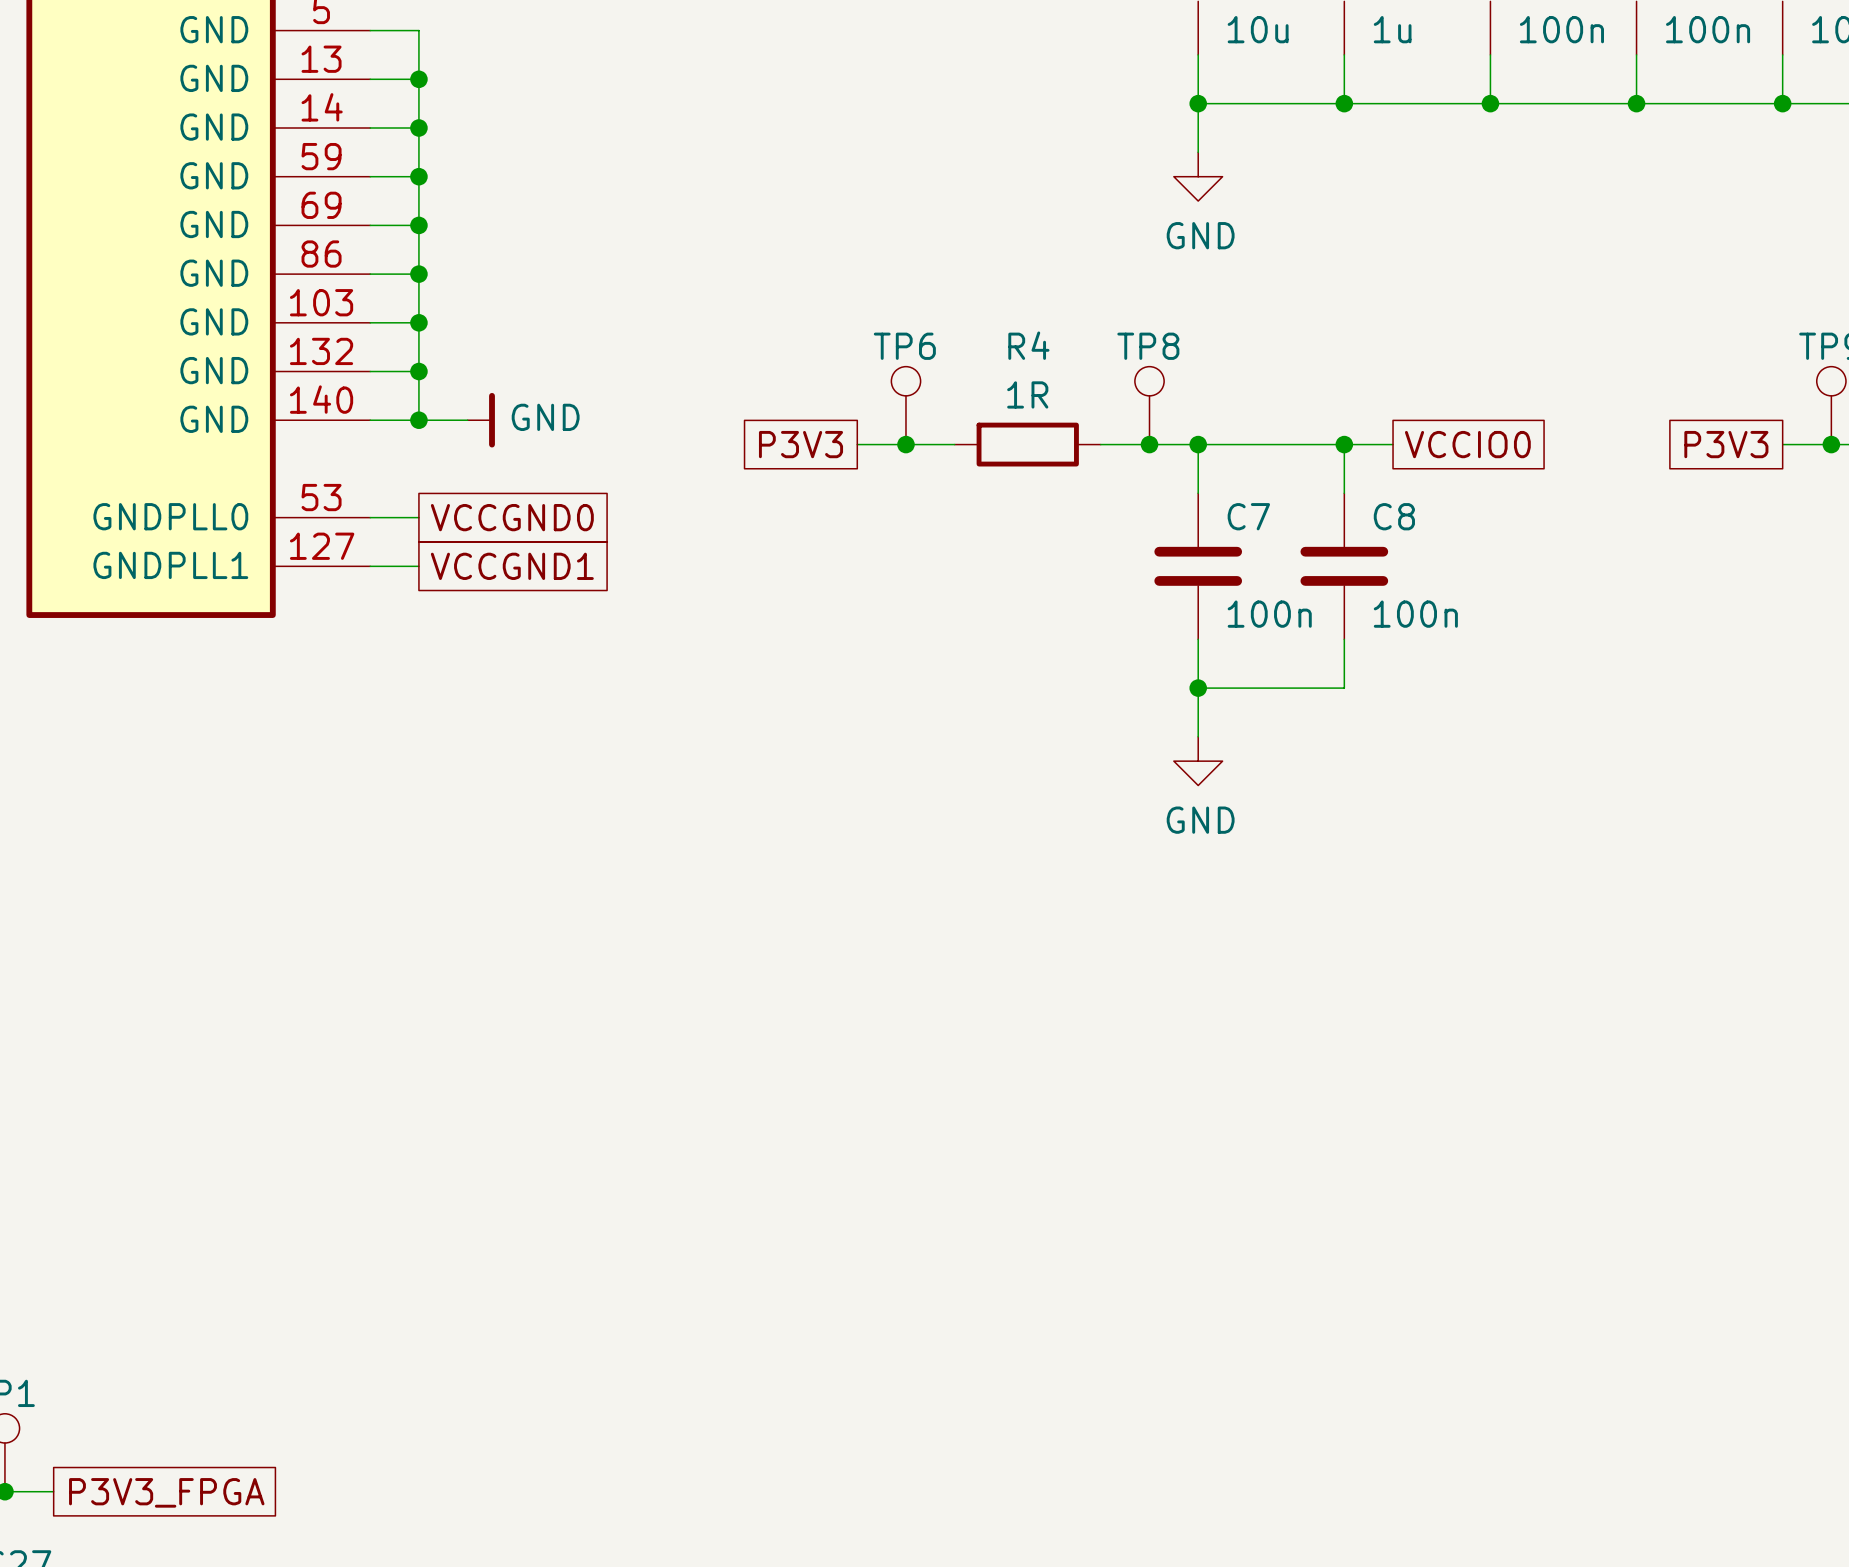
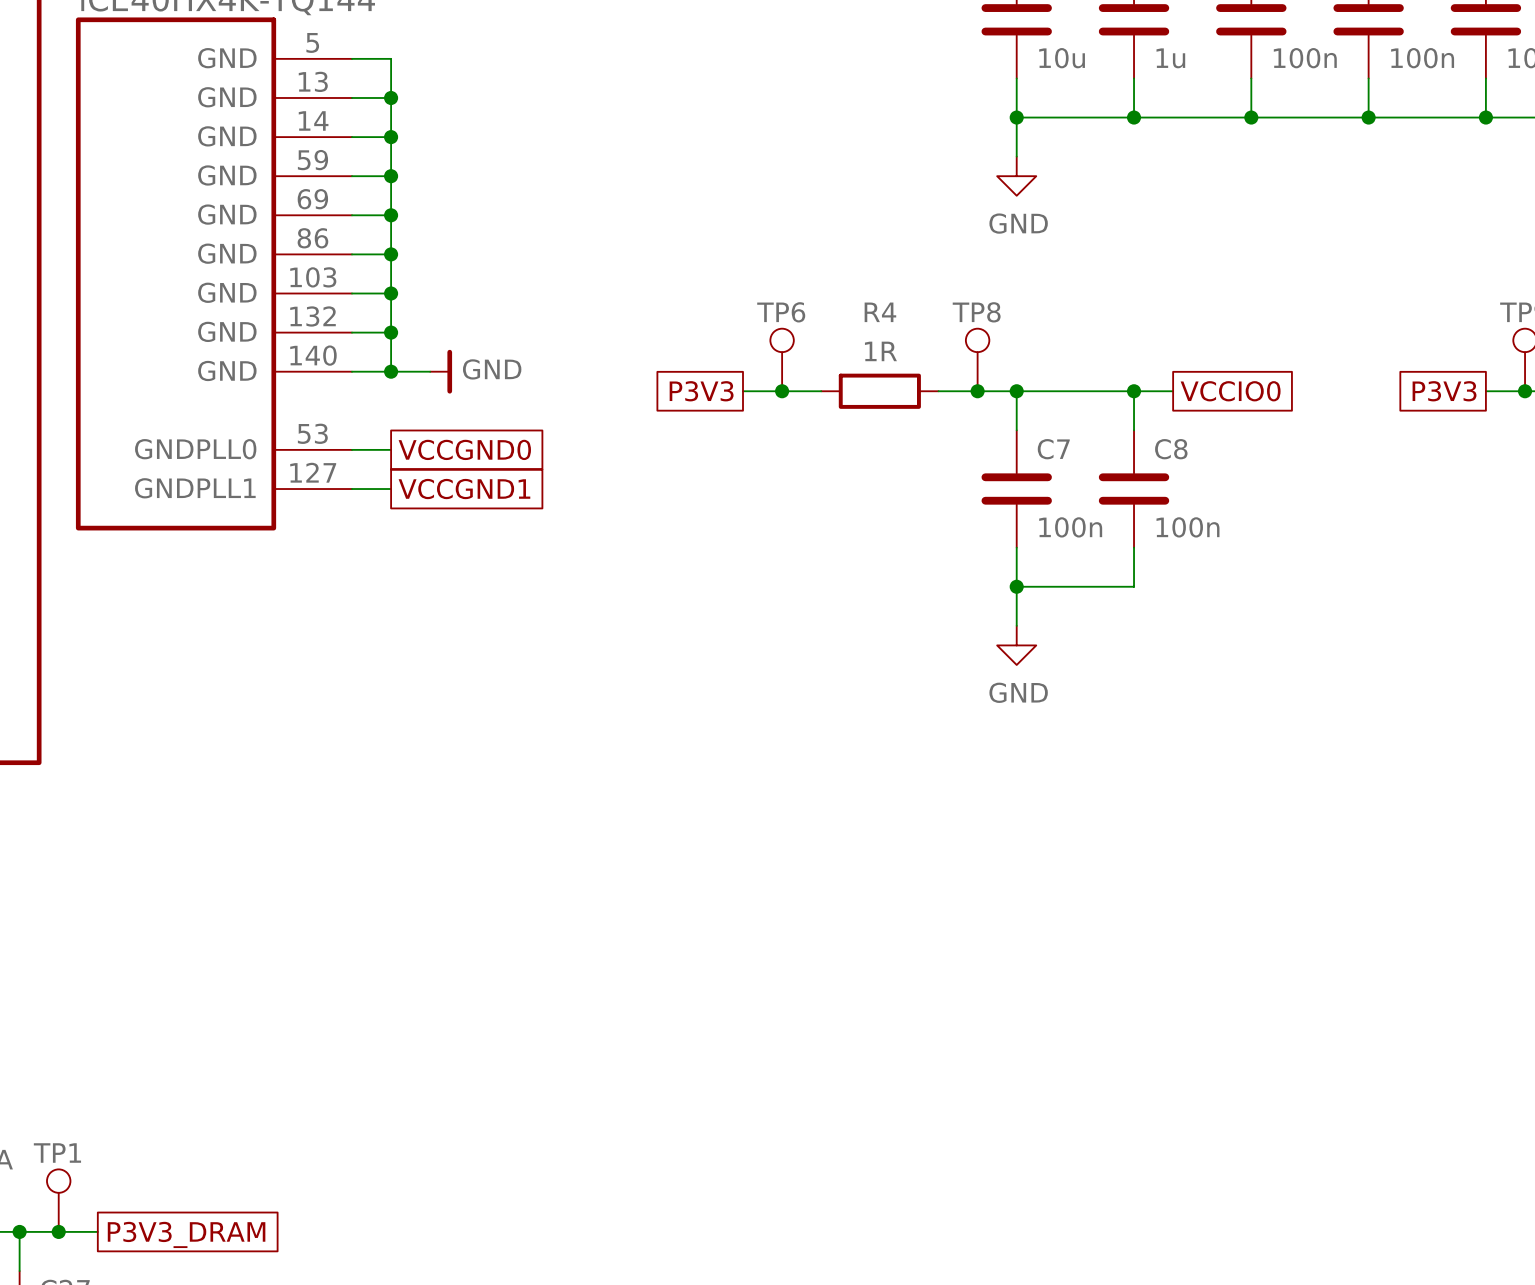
global label: P3V3_FPGA (166, 1492) -> P3V3_DRAM (186, 1234)

